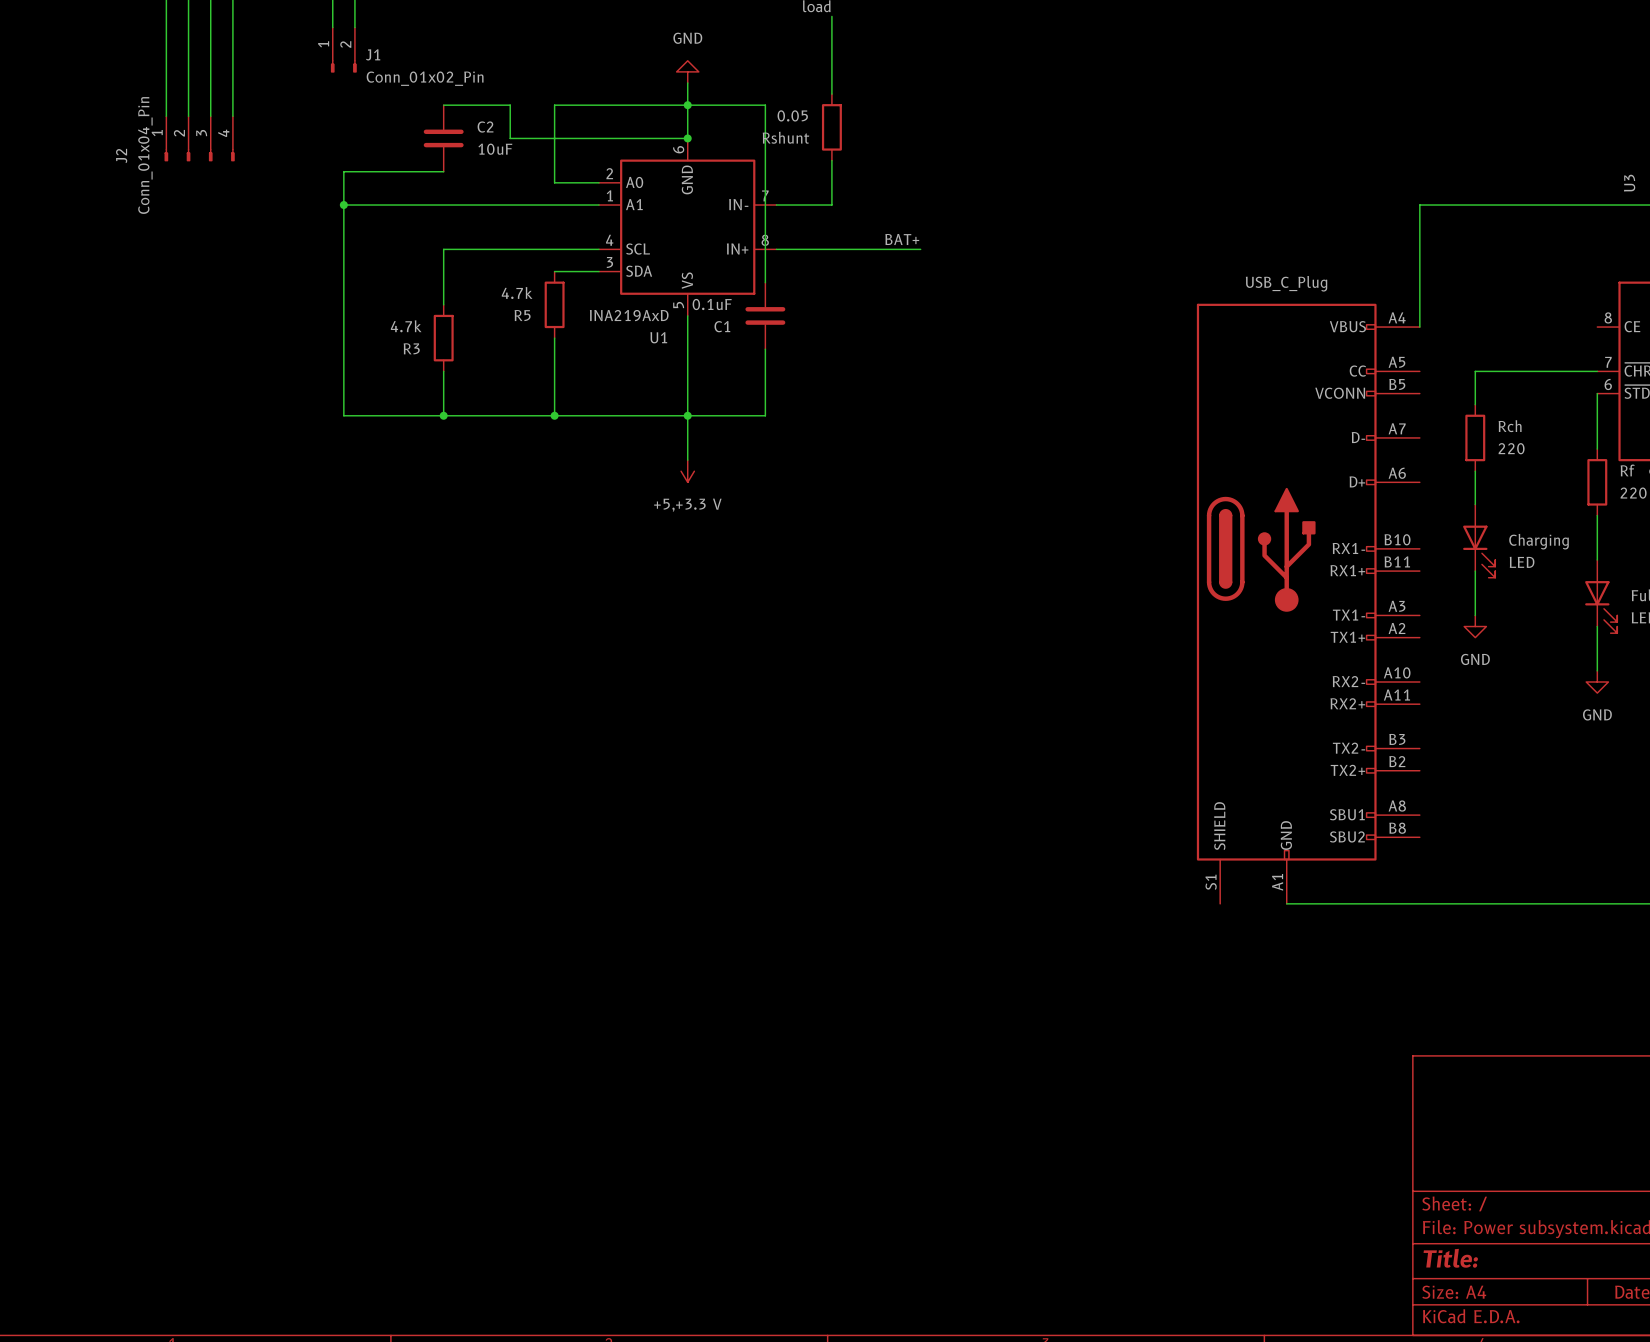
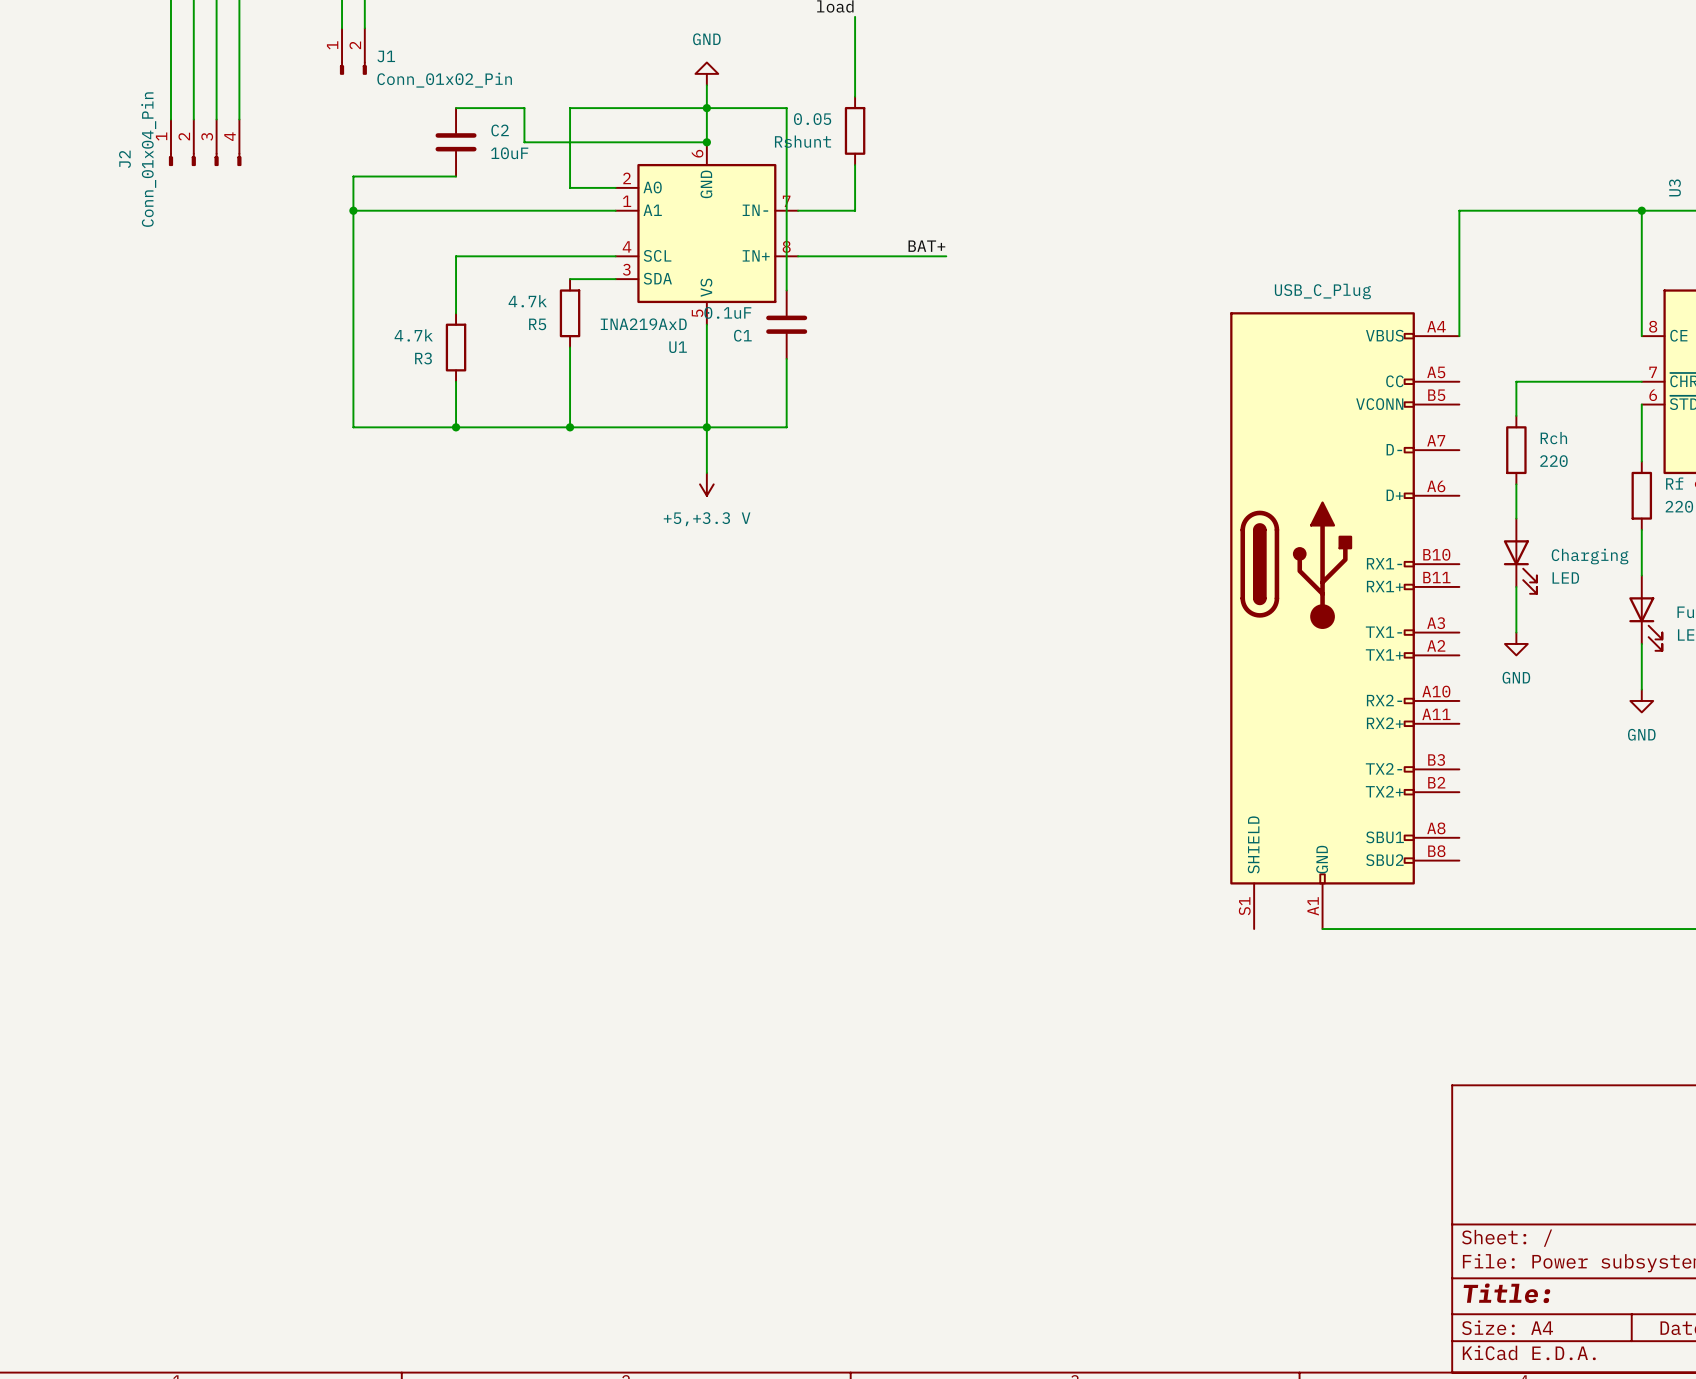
wire: none -> (1641, 210) (1641, 336)
junction: none -> (1641, 210)

